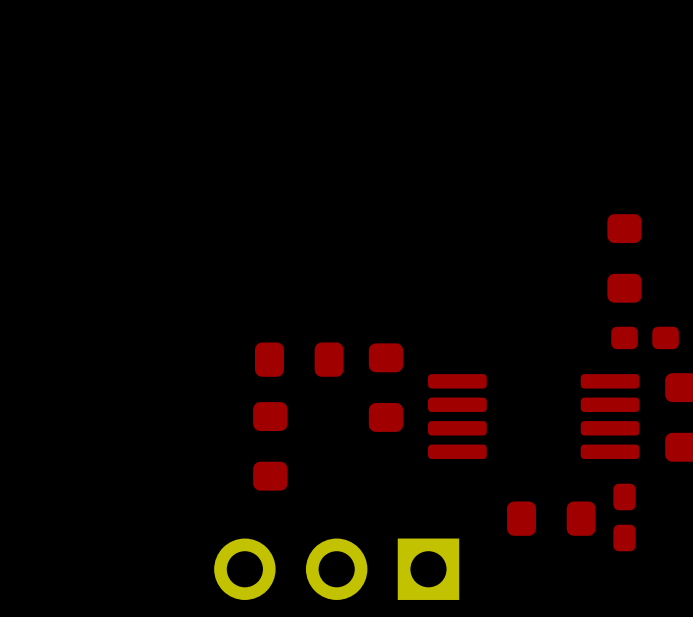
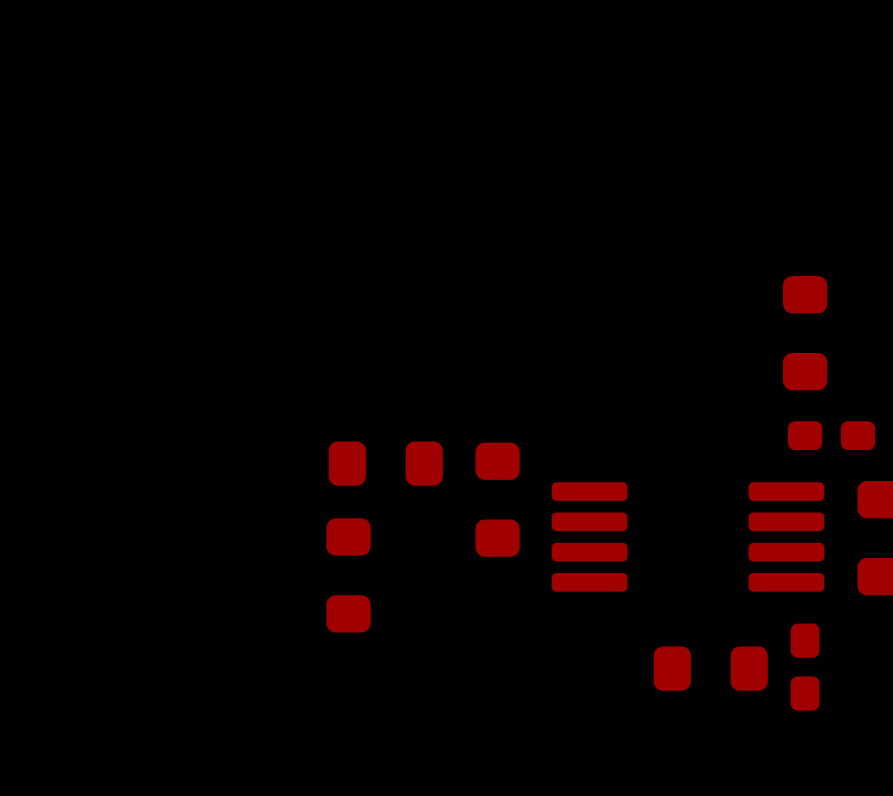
part: (336, 569) -> none

